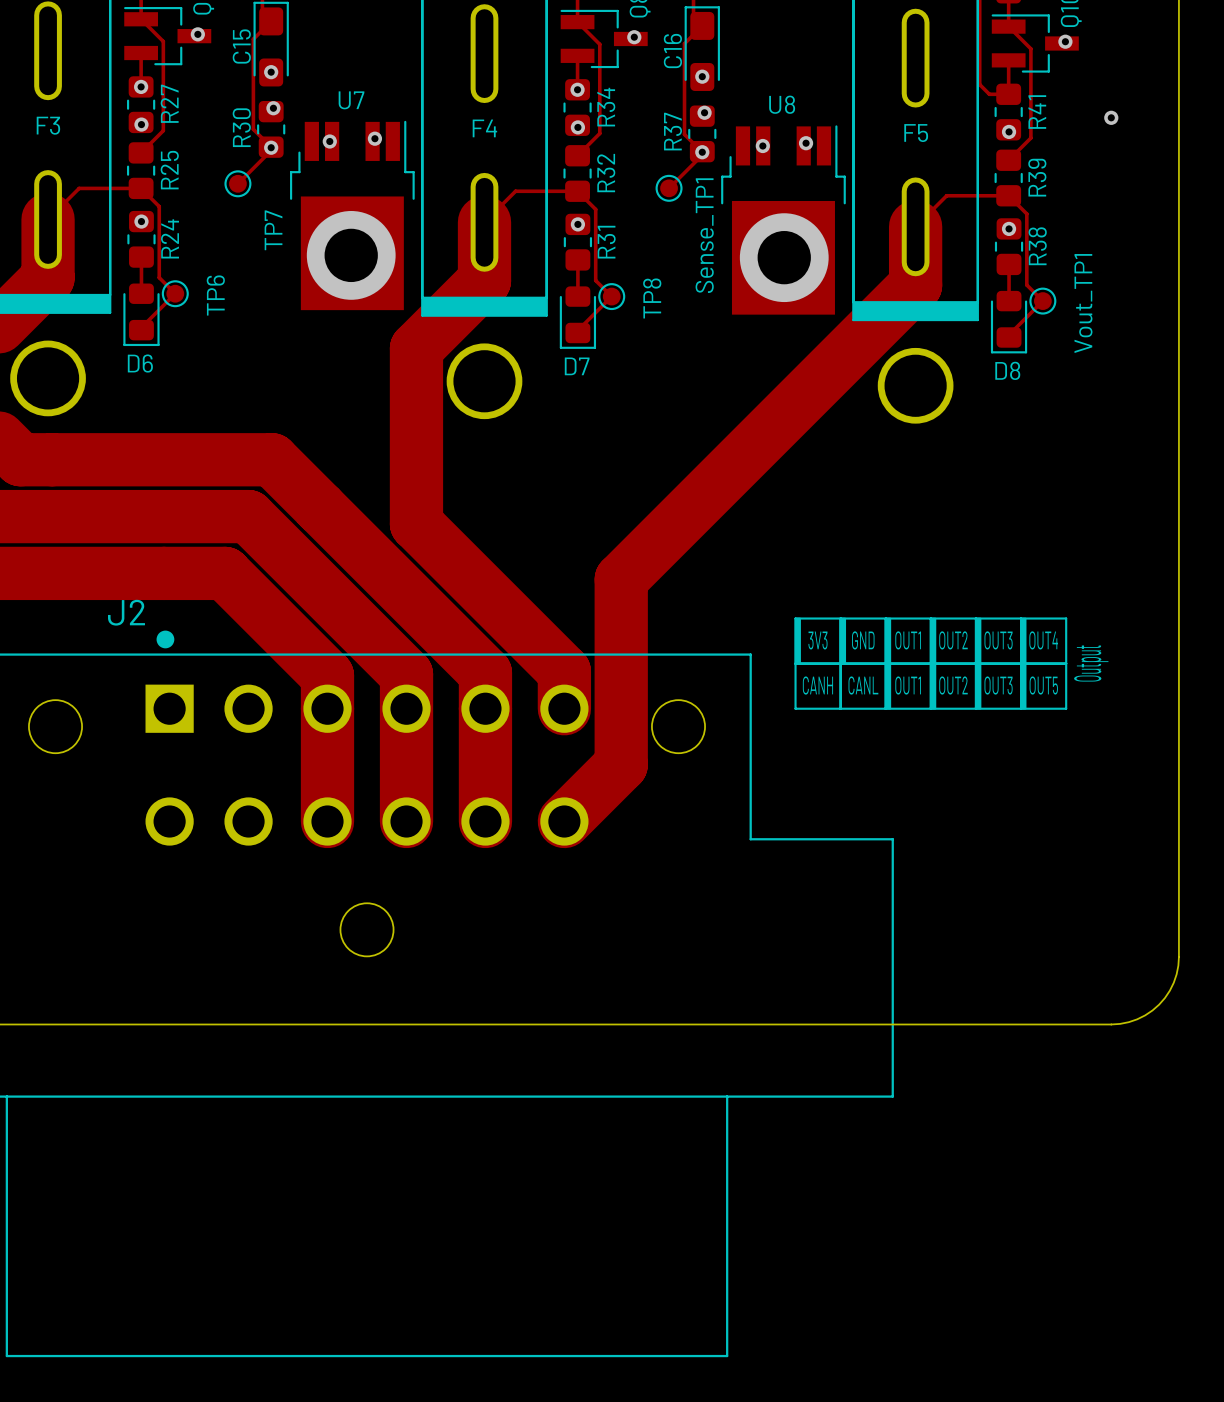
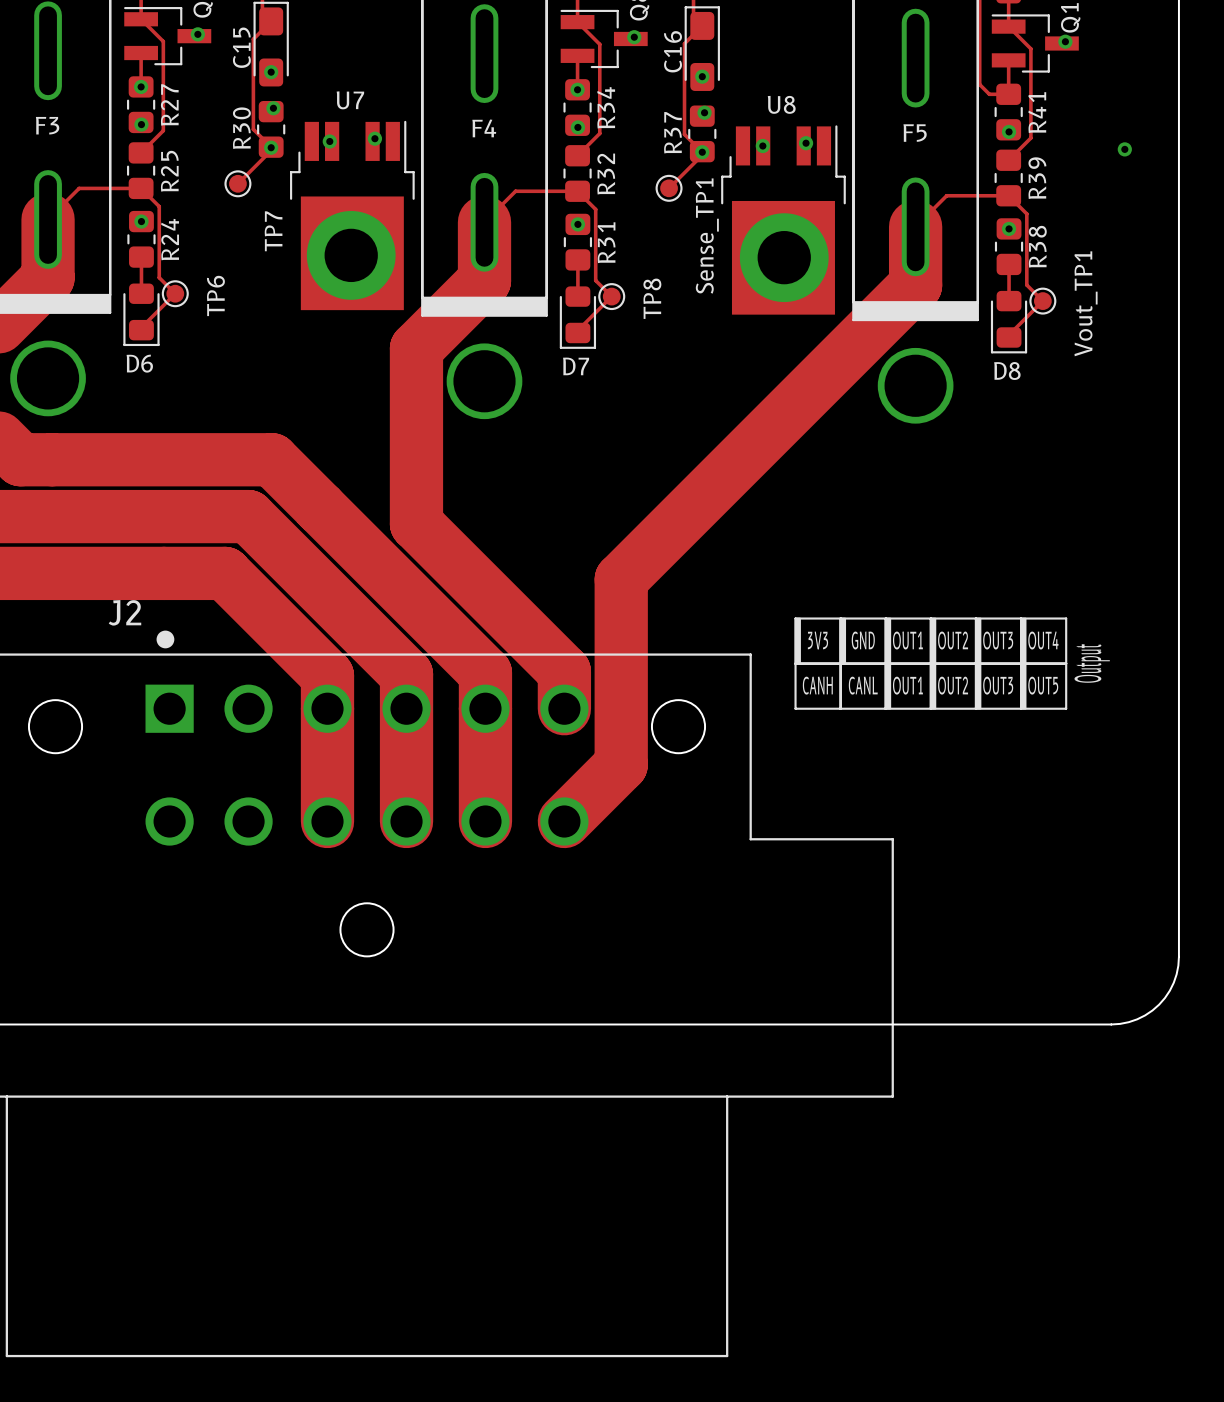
via position: (1111, 117) -> (1124, 149)

